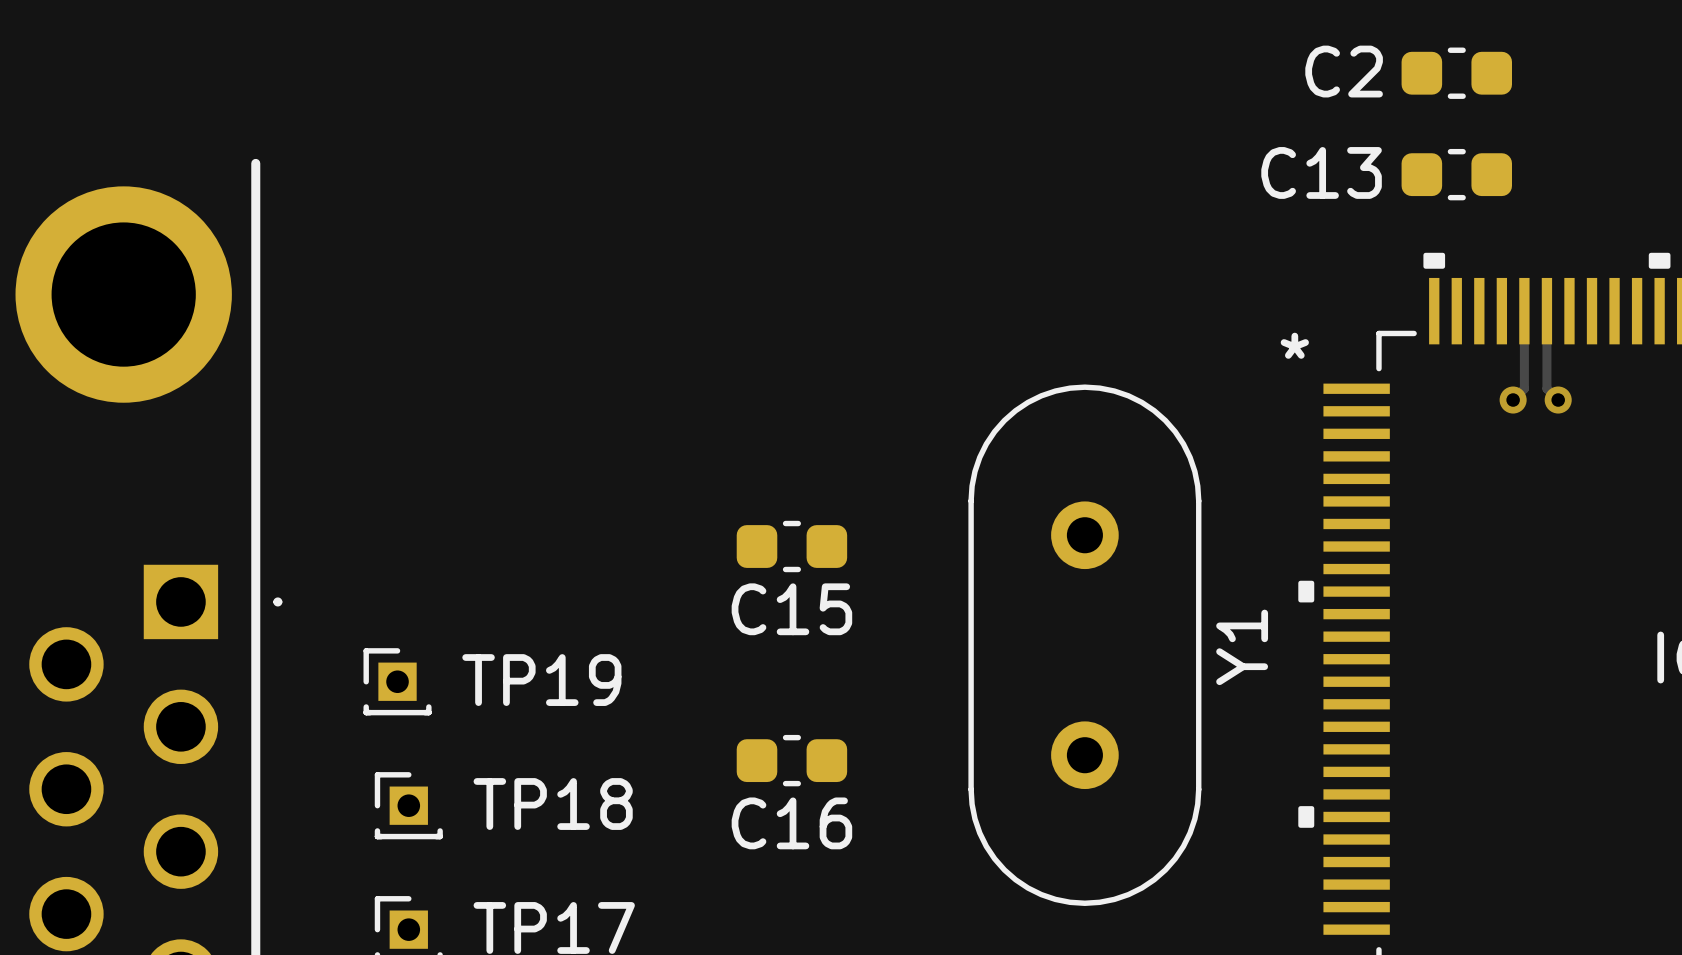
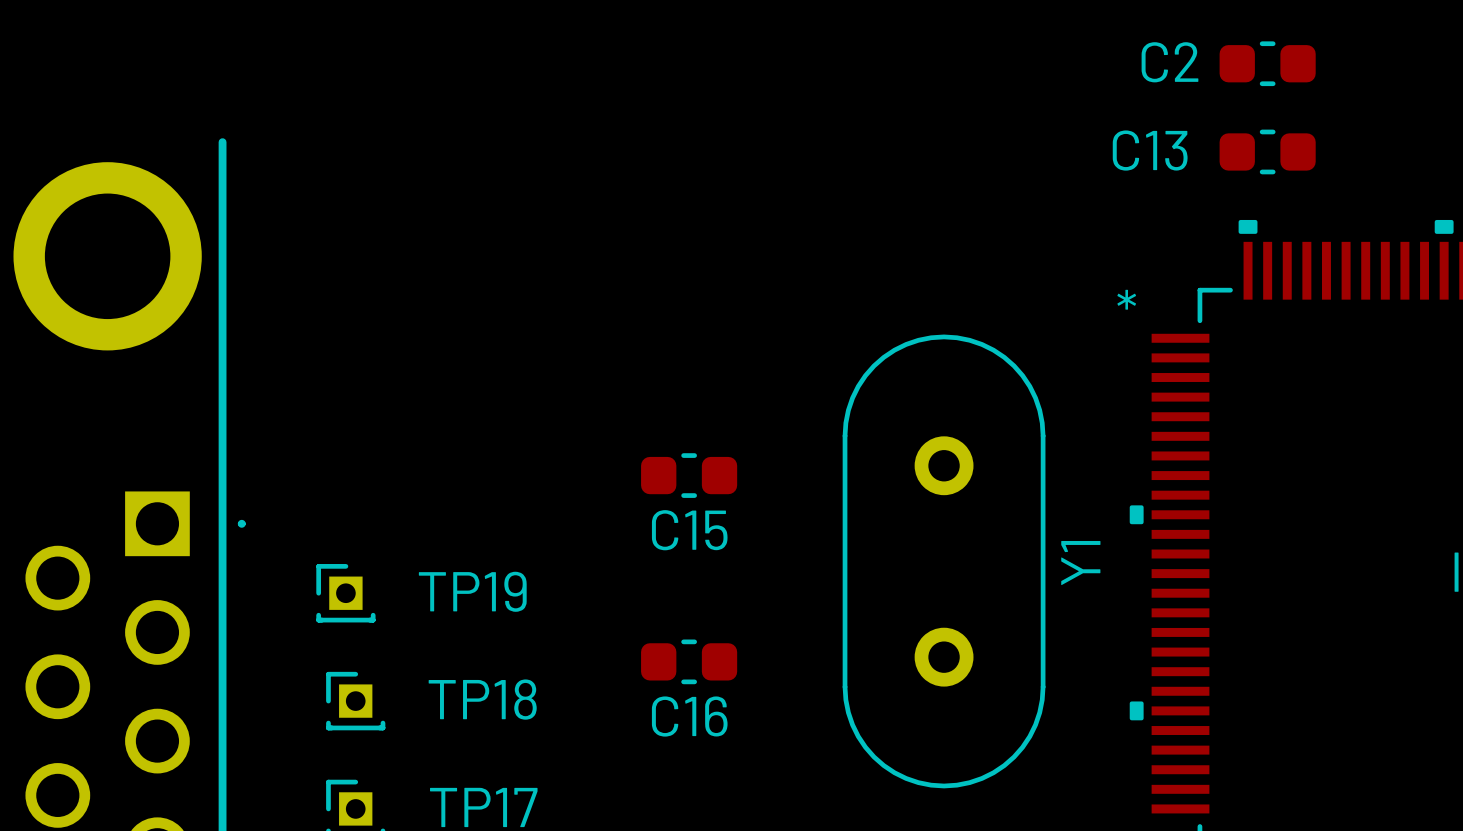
track: (1524, 311) (1524, 388) (1513, 400) -> none
track: (1546, 311) (1546, 388) (1558, 400) -> none
via: (1513, 400) -> none
via: (1558, 400) -> none

